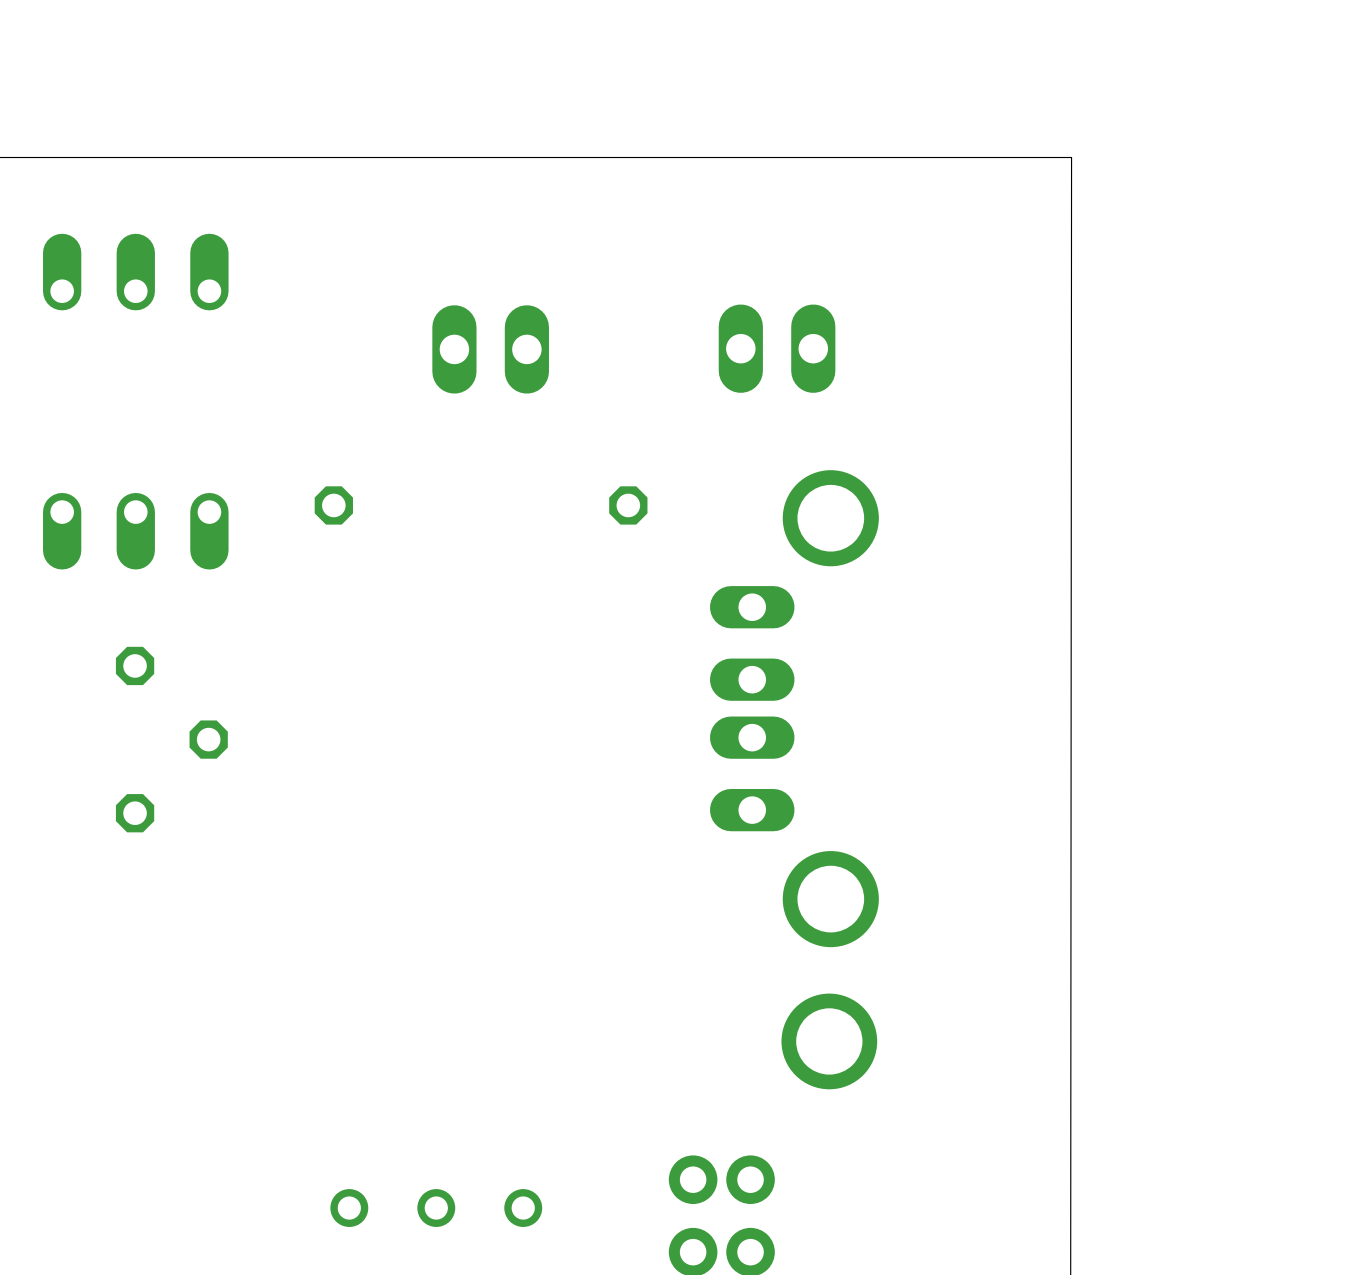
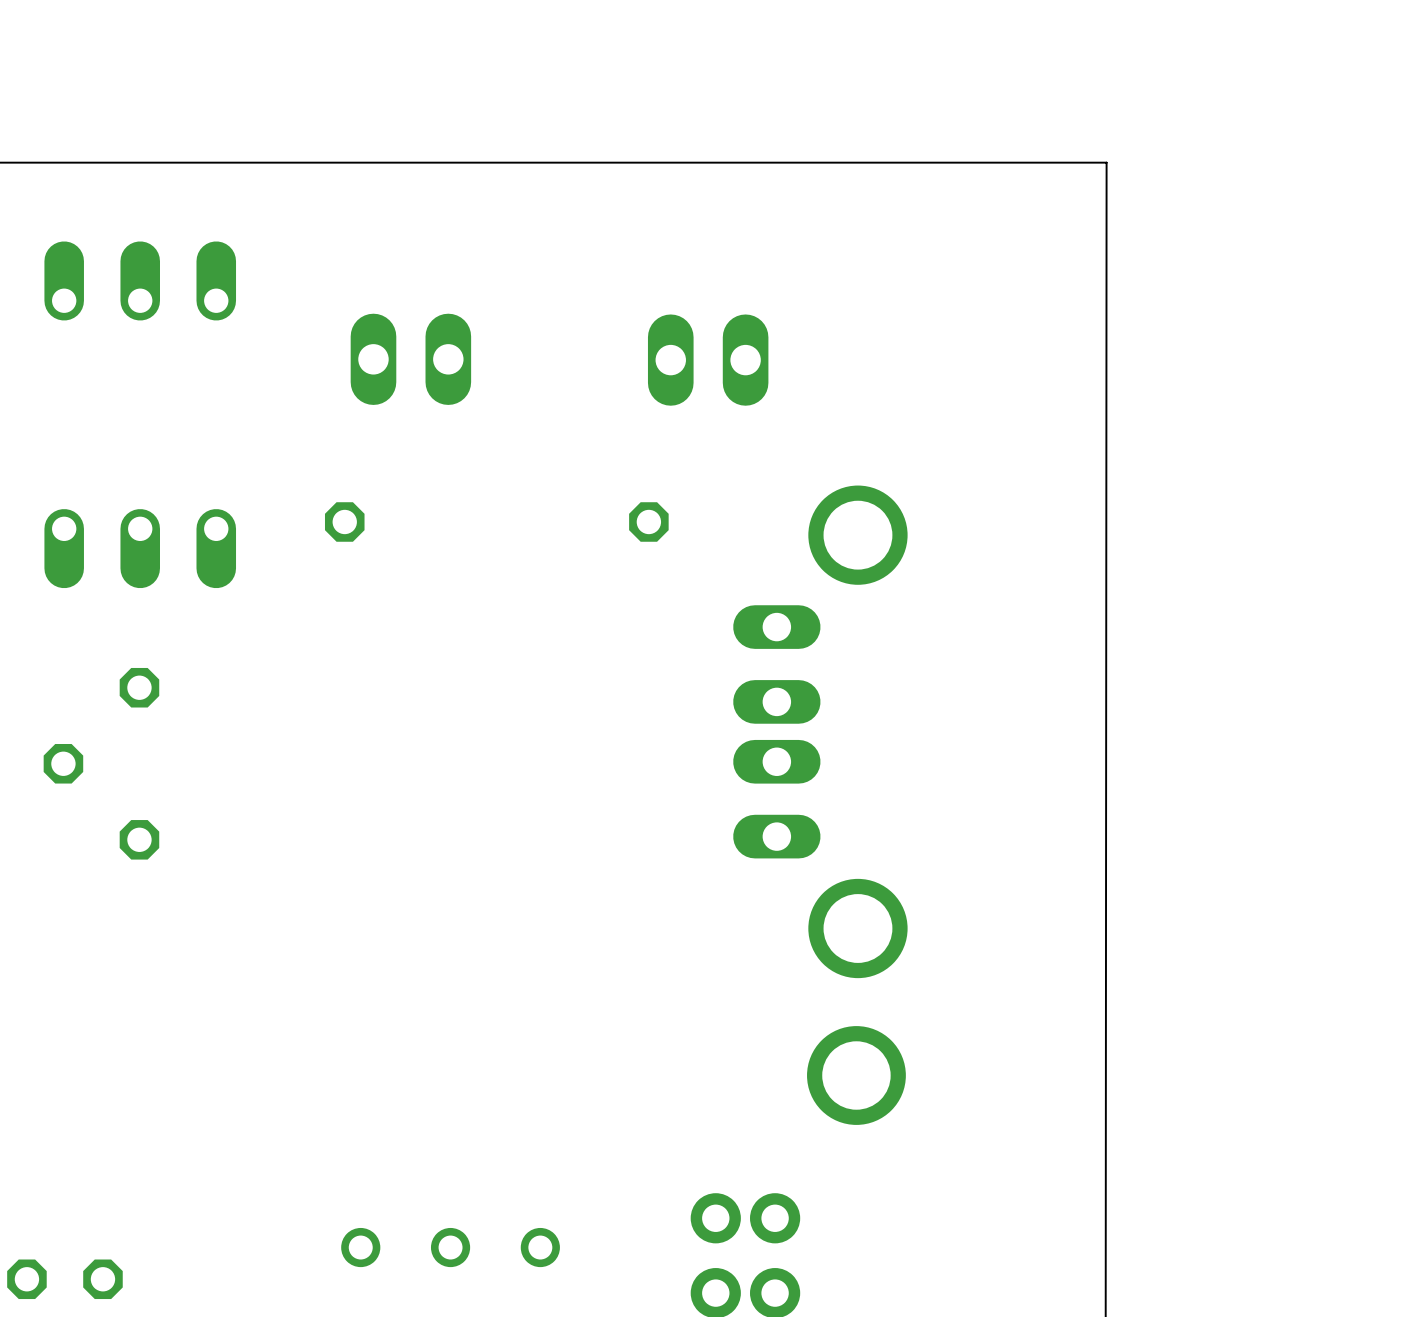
part position: (777, 348) -> (708, 360)
part position: (490, 349) -> (410, 359)
part rotation: 0° (171, 739) -> 180° (101, 763)
part: none -> (64, 1279)

